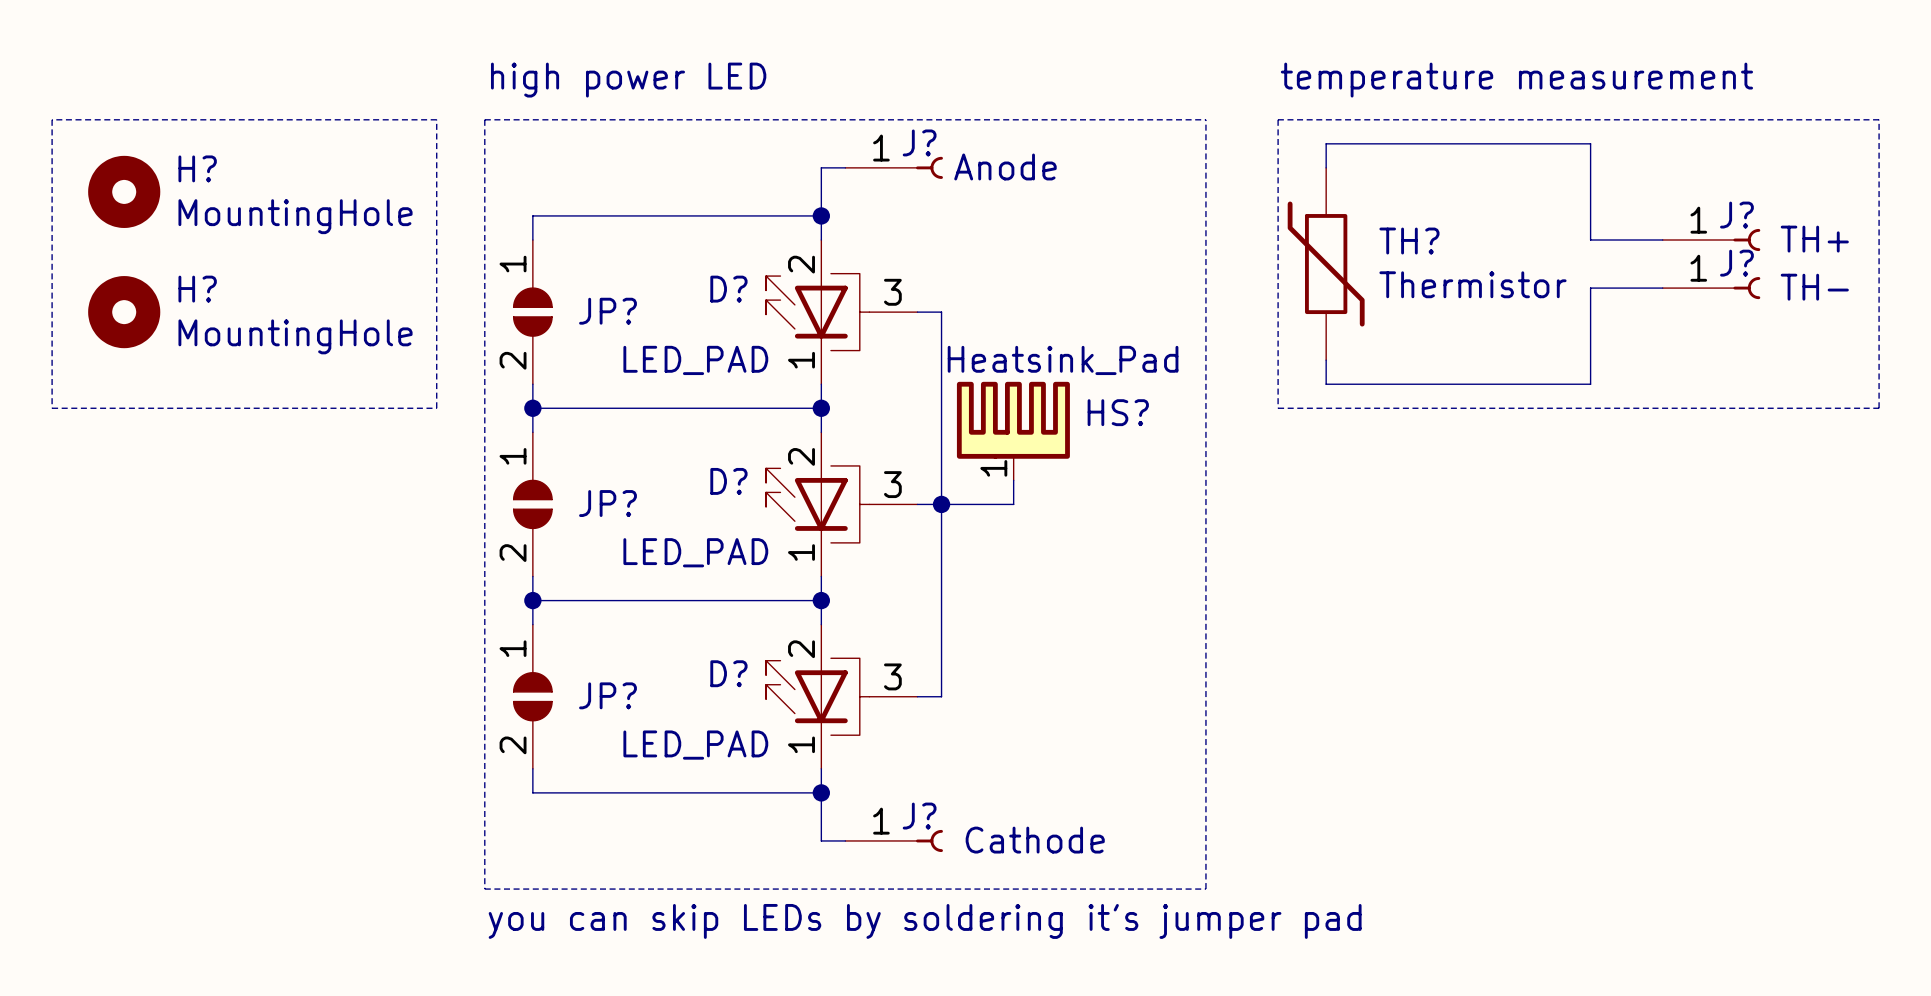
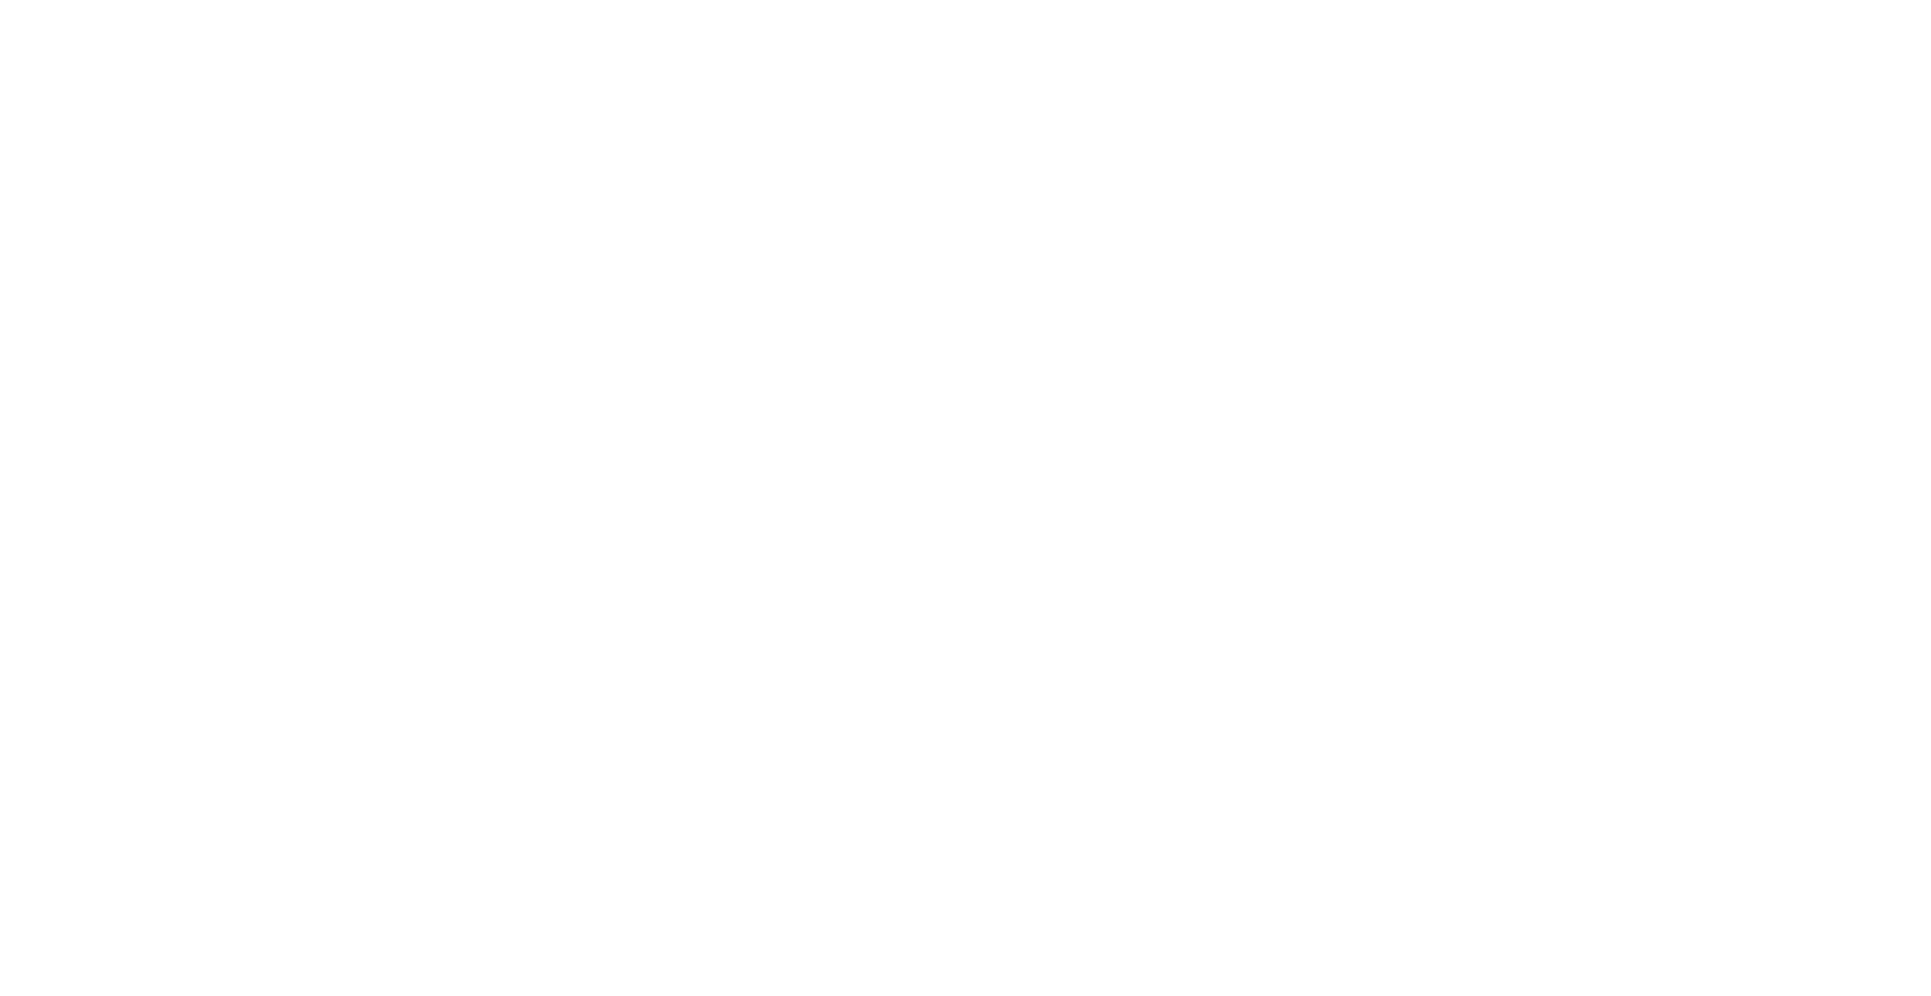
text: high power LED (628, 80) -> none
text: temperature measurement (1516, 80) -> none
line: (52, 119) (436, 119) (436, 408) (52, 408) (52, 119) -> none
line: (484, 119) (484, 889) (1205, 889) (1205, 119) (484, 119) -> none
line: (1278, 119) (1879, 119) (1879, 408) (1278, 408) (1278, 119) -> none
wire: (845, 167) (821, 167) (821, 240) -> none
J?: Anode (894, 167) -> none
wire: (1326, 167) (1326, 143) (1590, 143) (1590, 240) (1662, 240) -> none
H?: MountingHole (124, 191) -> none
wire: (821, 215) (532, 215) (532, 240) -> none
junction: (821, 215) -> none
J?: TH+ (1711, 240) -> none
TH?: Thermistor (1326, 264) -> none
wire: (1662, 288) (1590, 288) (1590, 384) (1326, 384) (1326, 360) -> none
J?: TH- (1711, 288) -> none
H?: MountingHole (124, 312) -> none
JP?: (532, 312) -> none
D?: LED_PAD (841, 312) -> none
wire: (917, 312) (941, 312) (941, 696) (917, 696) -> none
wire: (532, 384) (532, 432) -> none
wire: (821, 384) (821, 432) -> none
wire: (532, 408) (821, 408) -> none
junction: (532, 408) -> none
junction: (821, 408) -> none
HS?: Heatsink_Pad (1013, 431) -> none
wire: (1013, 480) (1013, 504) (917, 504) -> none
JP?: (532, 504) -> none
D?: LED_PAD (841, 504) -> none
junction: (941, 504) -> none
wire: (532, 576) (532, 624) -> none
wire: (821, 576) (821, 624) -> none
wire: (532, 600) (821, 600) -> none
junction: (532, 600) -> none
junction: (821, 600) -> none
JP?: (532, 696) -> none
D?: LED_PAD (841, 696) -> none
wire: (532, 768) (532, 792) (821, 792) -> none
wire: (821, 768) (821, 840) (845, 840) -> none
junction: (821, 792) -> none
J?: Cathode (894, 840) -> none
text: you can skip LEDs by soldering it's jumper pad (925, 921) -> none

